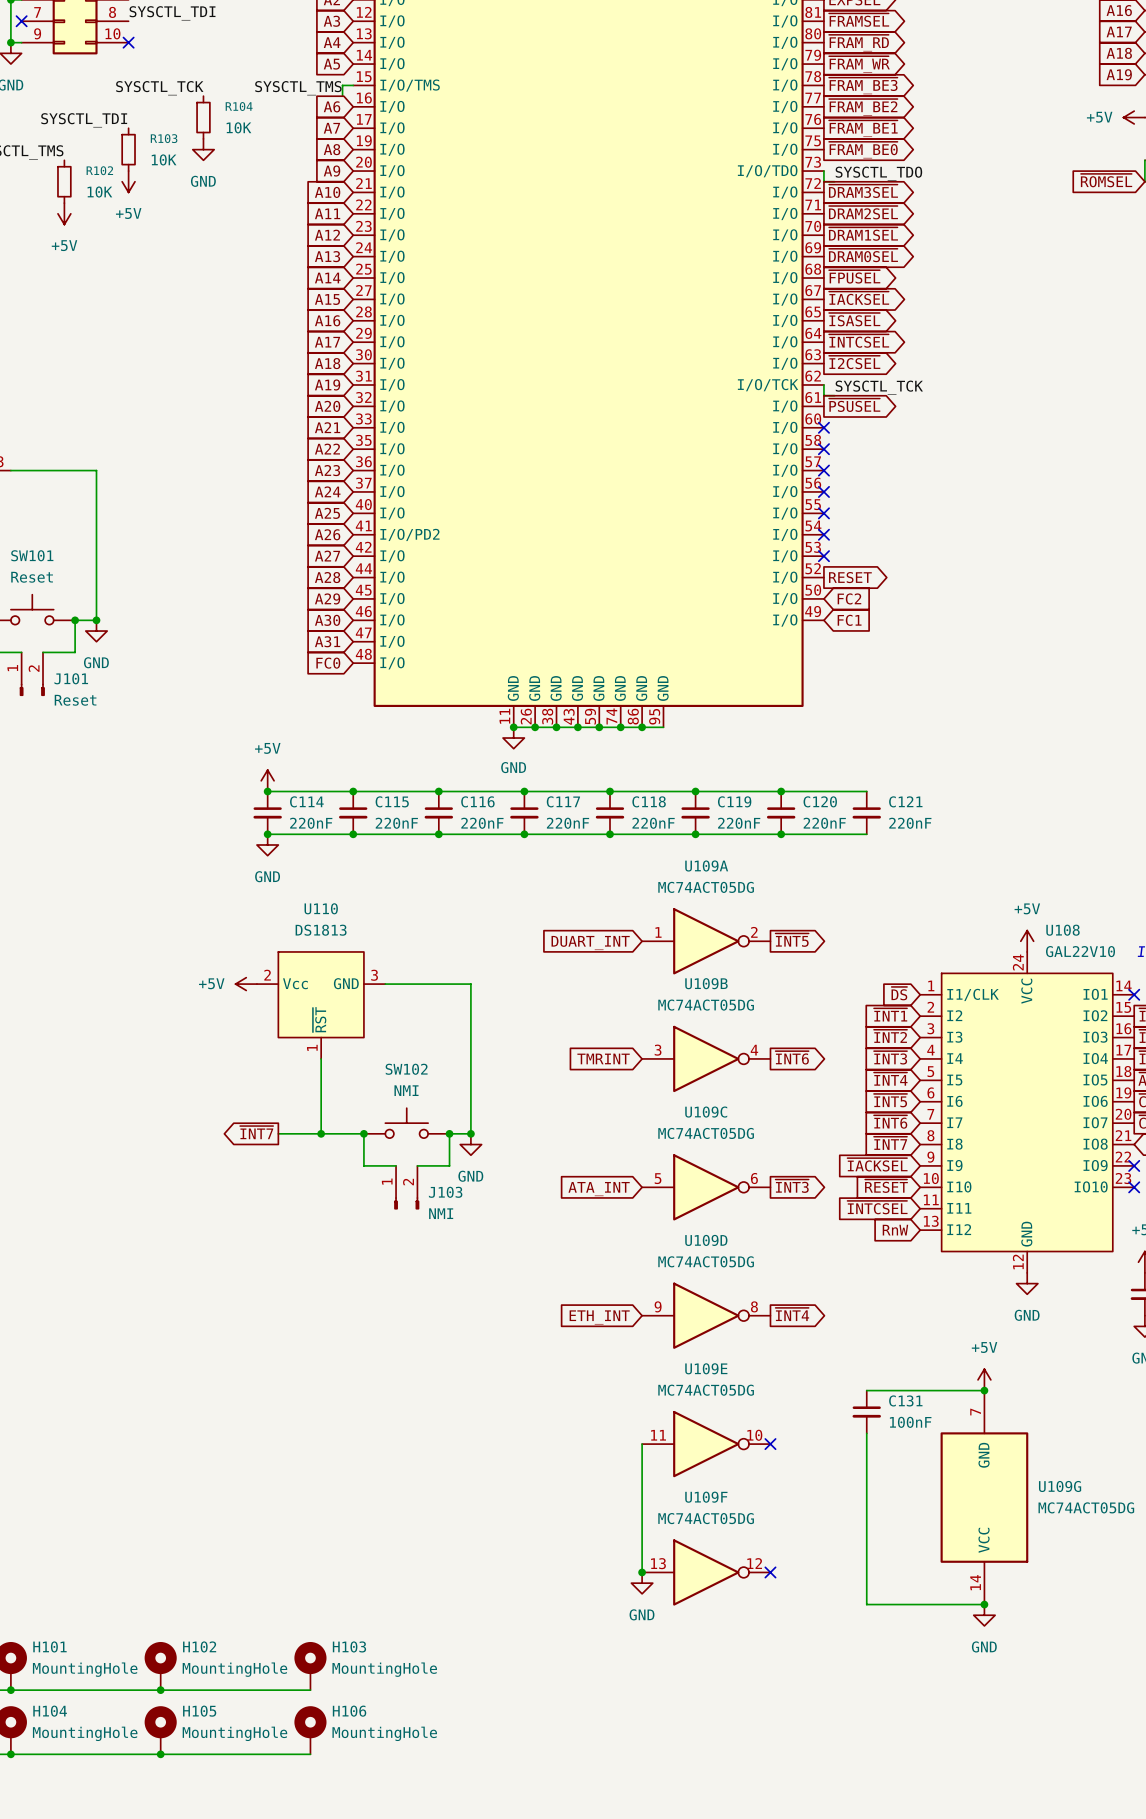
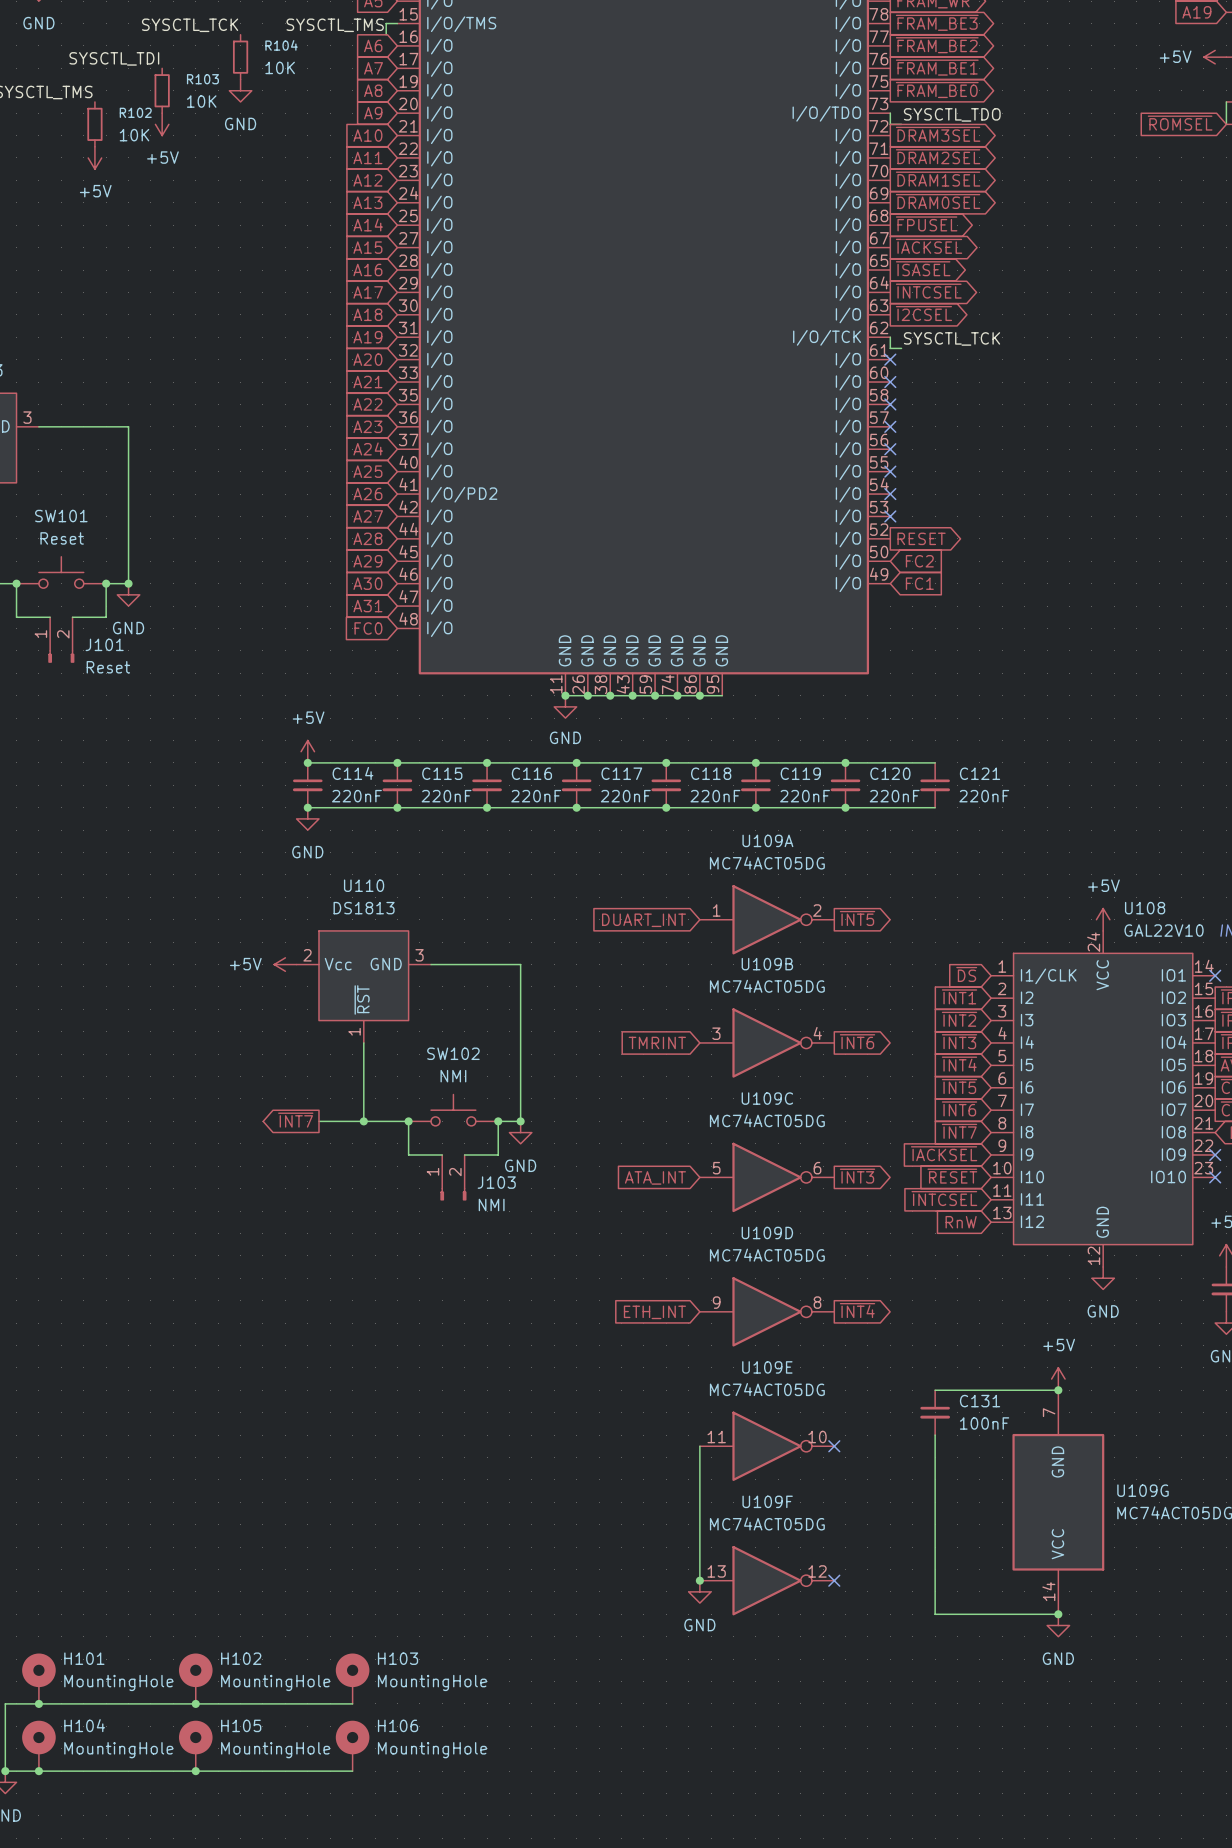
global label: ~{PSUSEL} (854, 405) -> none
no-connect mark: none -> (890, 359)

